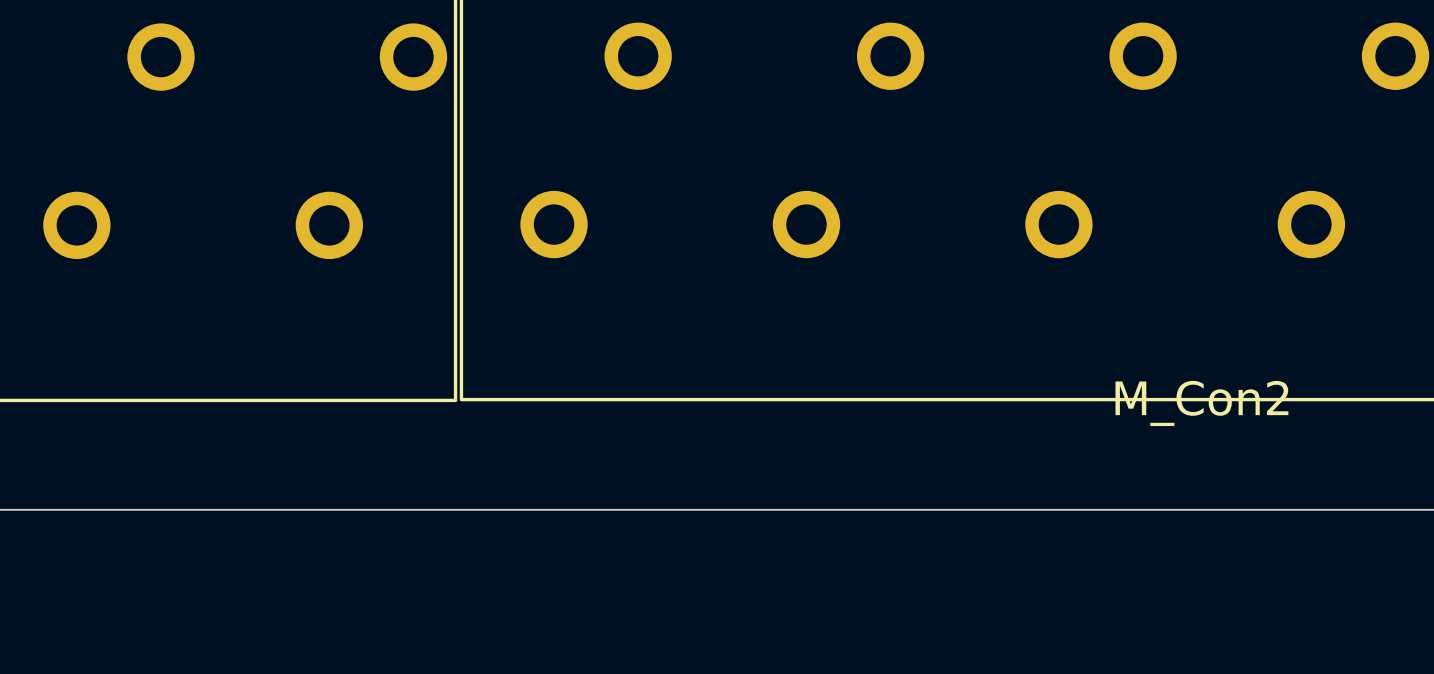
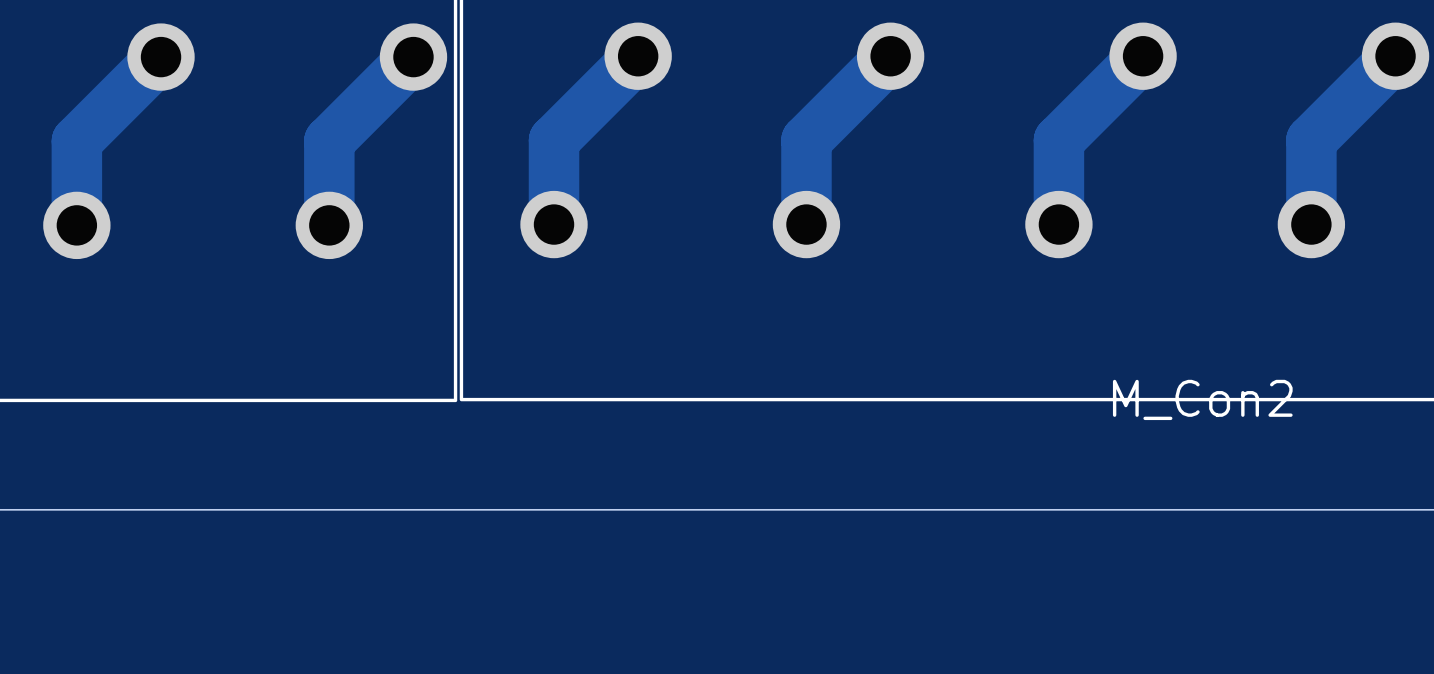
track: none -> (638, 56) (554, 140) (554, 224)
track: none -> (890, 56) (806, 140) (806, 224)
track: none -> (1143, 56) (1058, 140) (1058, 224)
track: none -> (1395, 56) (1311, 140) (1311, 224)
track: none -> (161, 57) (76, 141) (76, 225)
track: none -> (413, 57) (329, 141) (329, 225)

